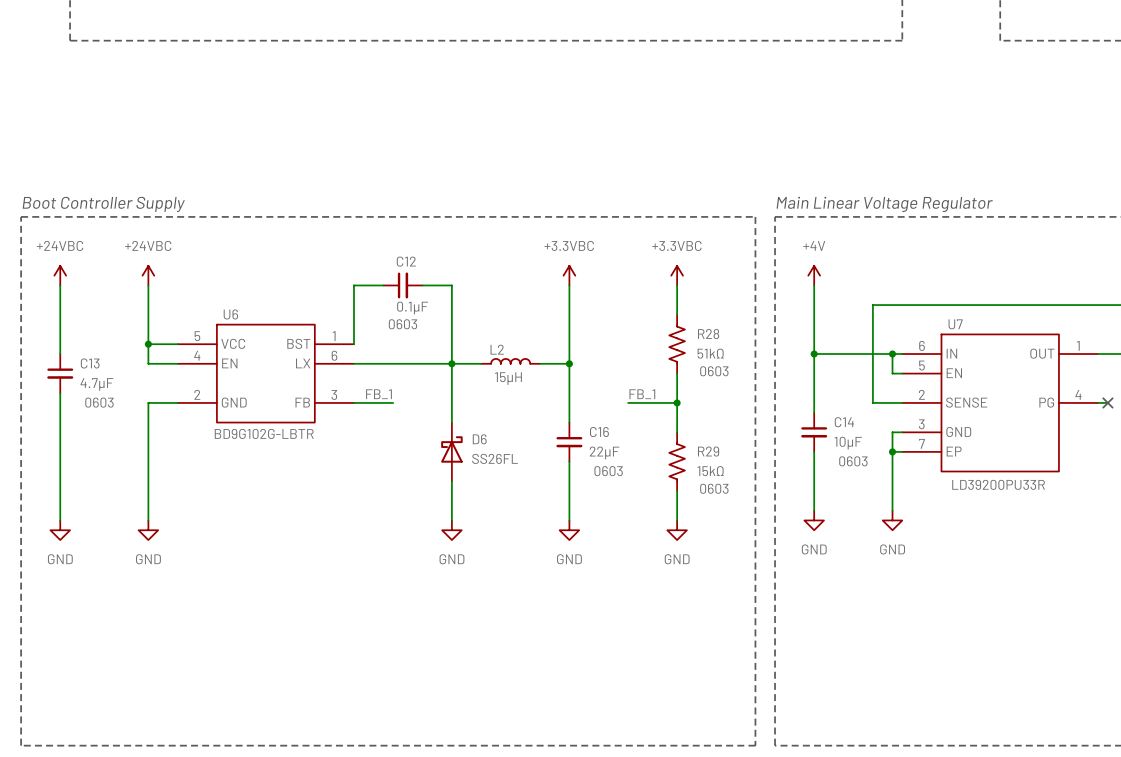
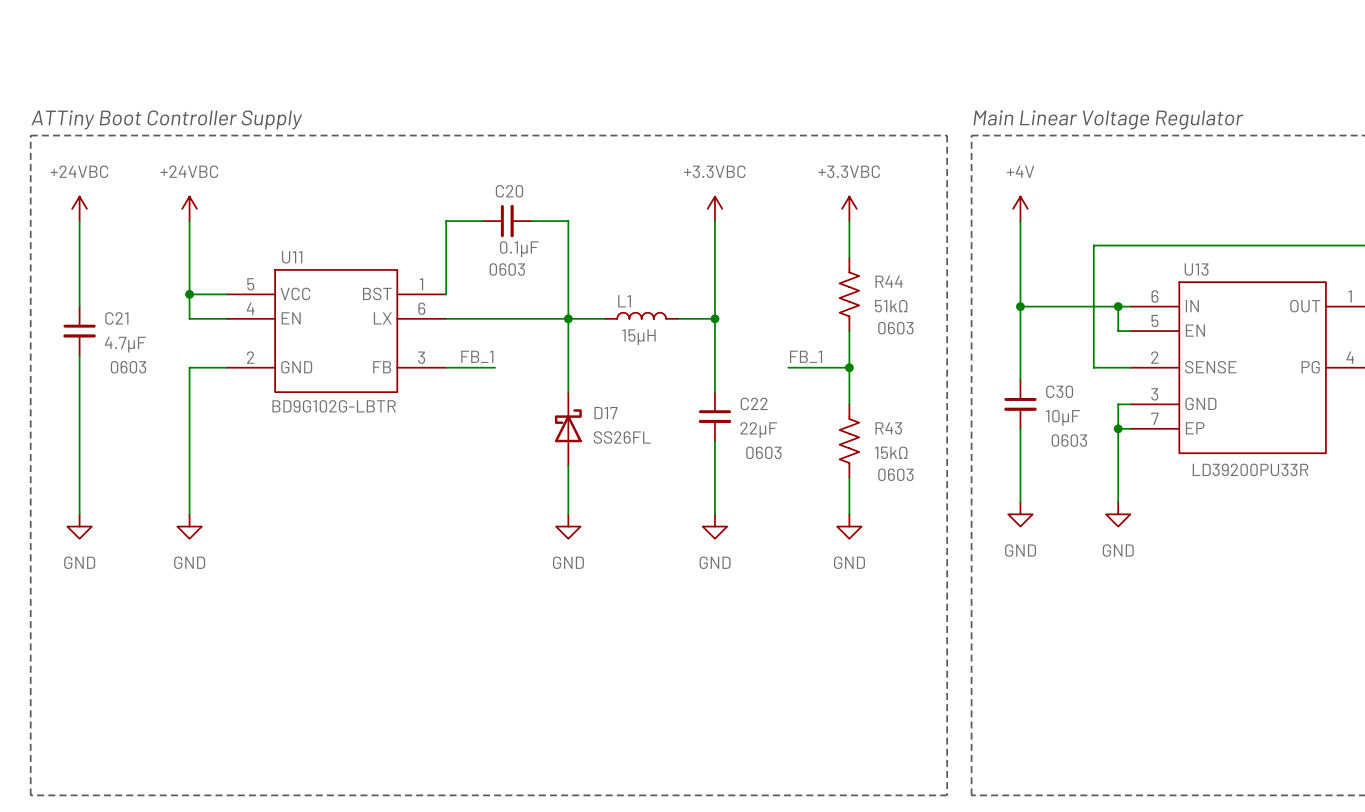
text: Boot Controller Supply (103, 204) -> ATTiny Boot Controller Supply (166, 119)
C12 name: C12 (406, 261) -> C20 (509, 191)
U6 name: U6 (230, 314) -> U11 (292, 257)
U7 name: U7 (955, 324) -> U13 (1196, 269)
R28 name: R28 (708, 334) -> R44 (889, 281)
L2 name: L2 (497, 349) -> L1 (624, 301)
C13 name: C13 (90, 363) -> C21 (116, 318)
C14 name: C14 (844, 422) -> C30 (1059, 391)
C16 name: C16 (599, 432) -> C22 (754, 403)
D6 name: D6 (479, 439) -> D17 (605, 413)
R29 name: R29 (708, 451) -> R43 (888, 428)

